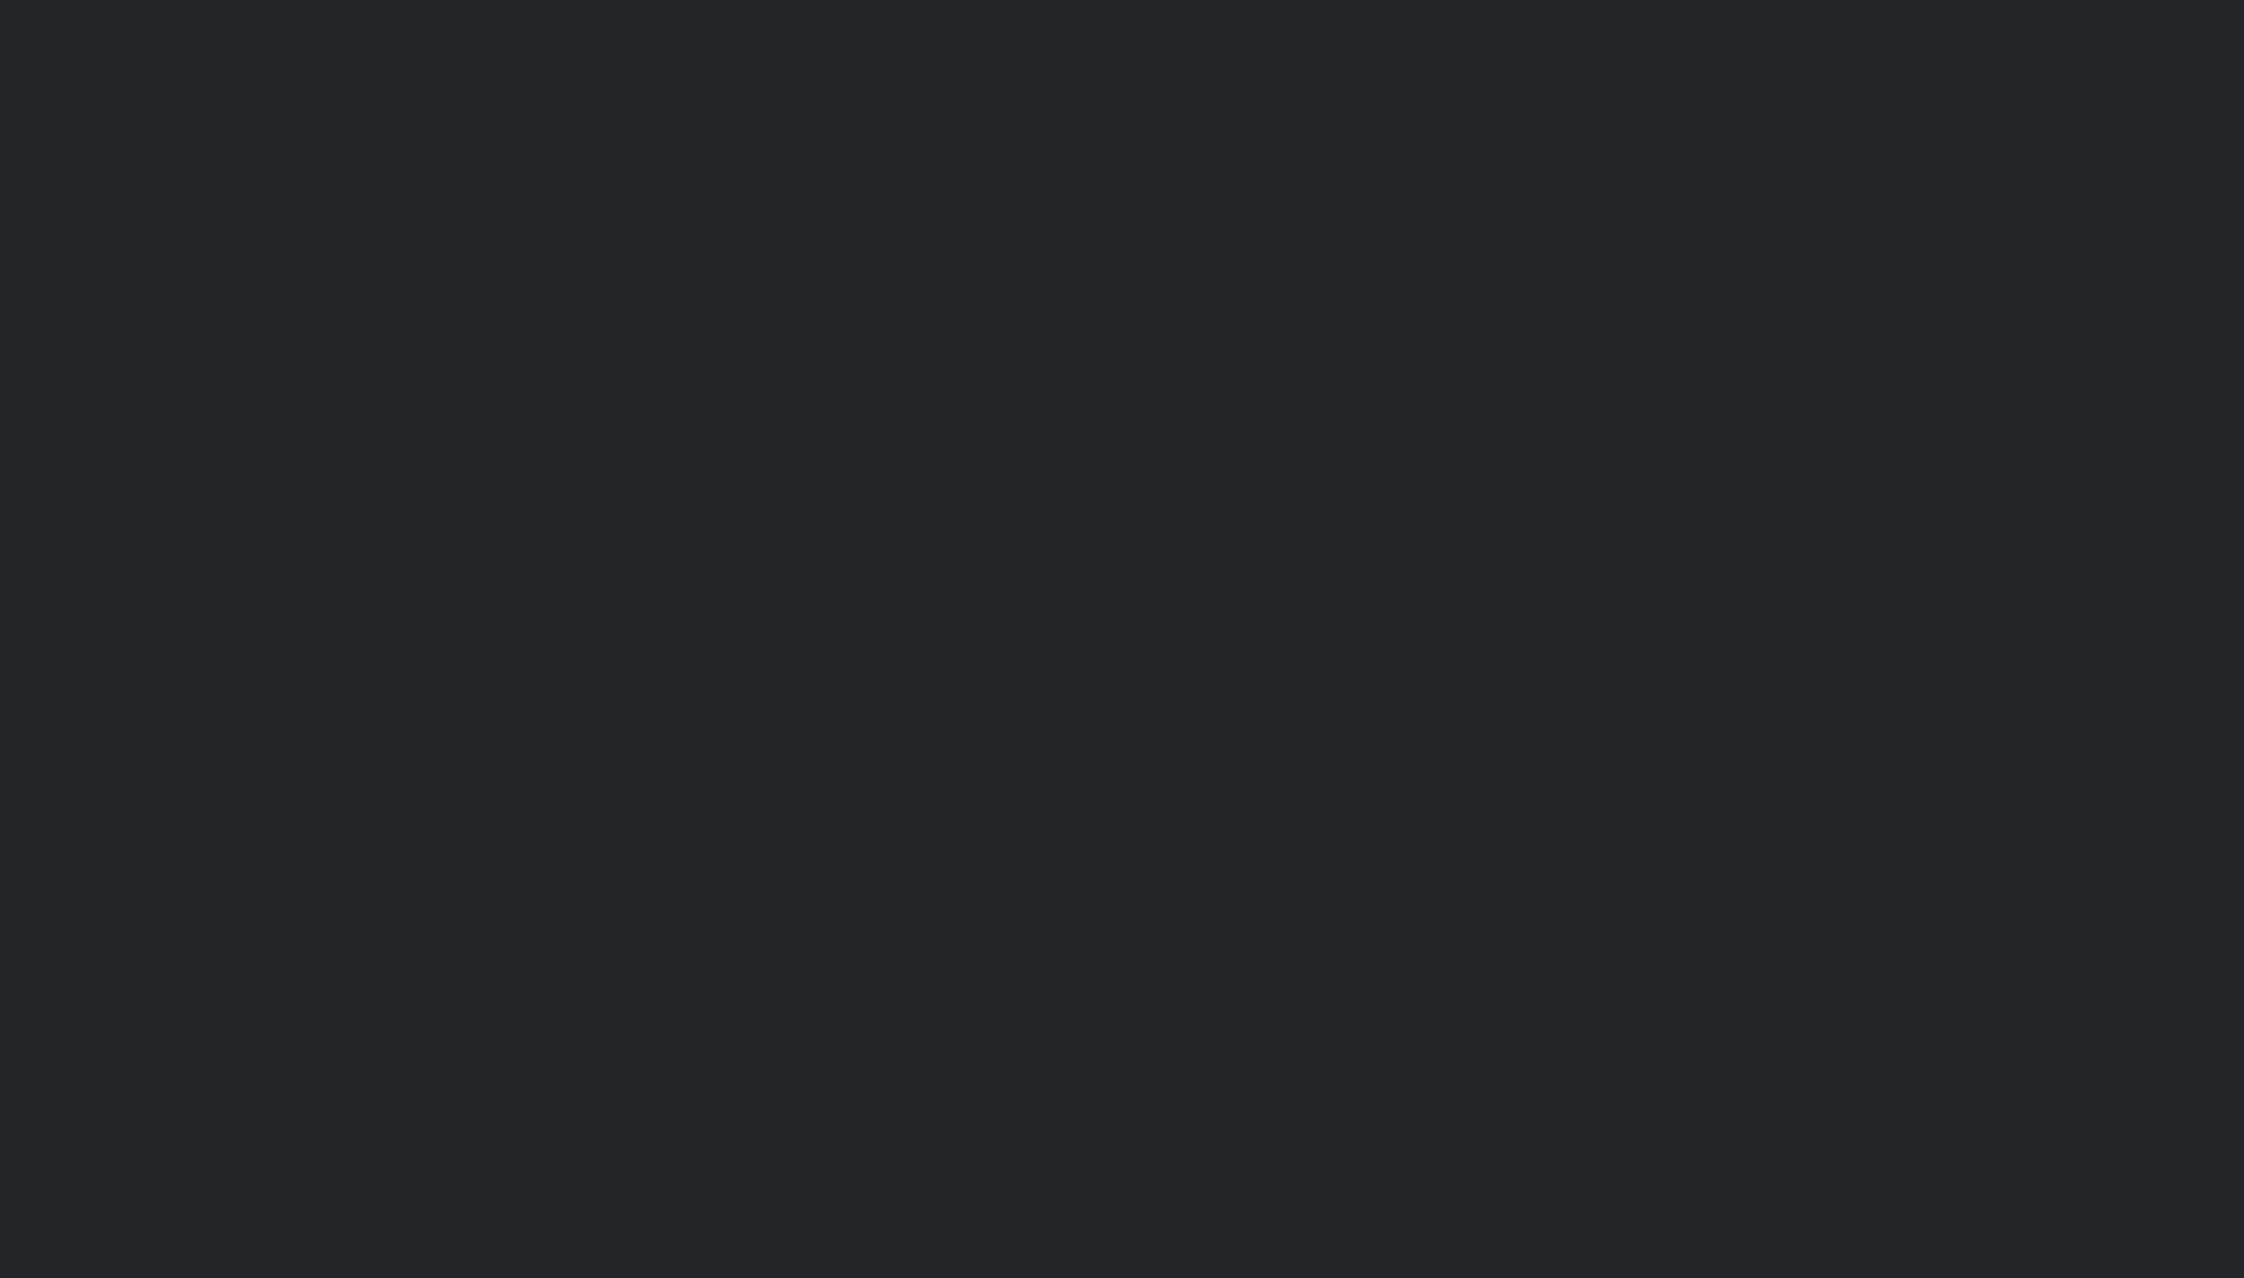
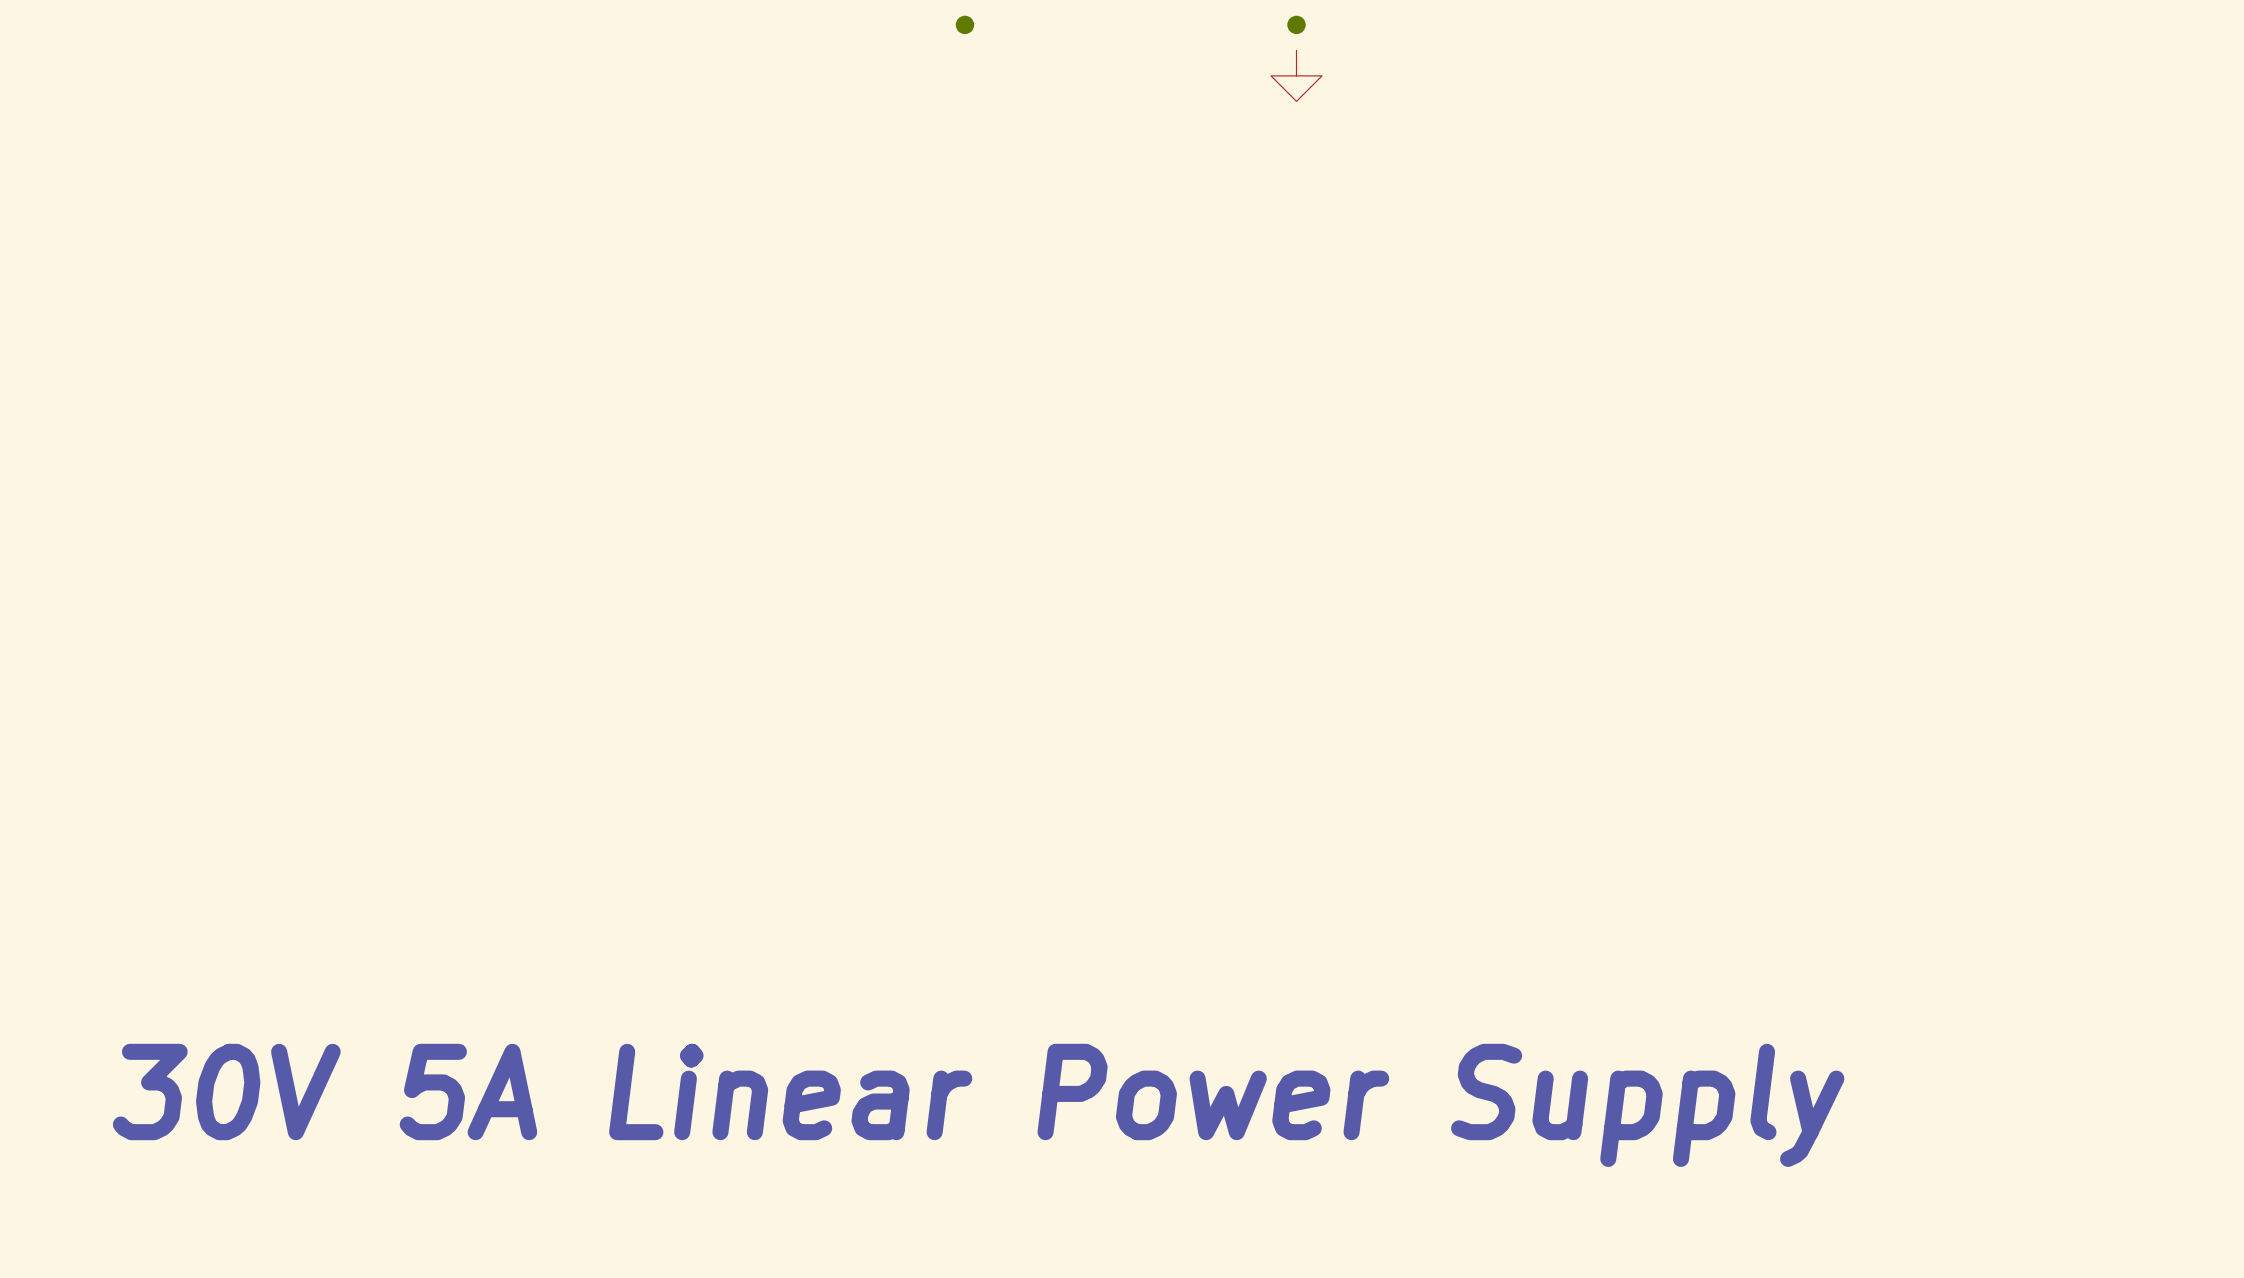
junction: none -> (964, 24)
junction: none -> (1296, 24)
power symbol: none -> (1296, 75)
text: none -> 30V 5A Linear Power Supply (978, 1105)

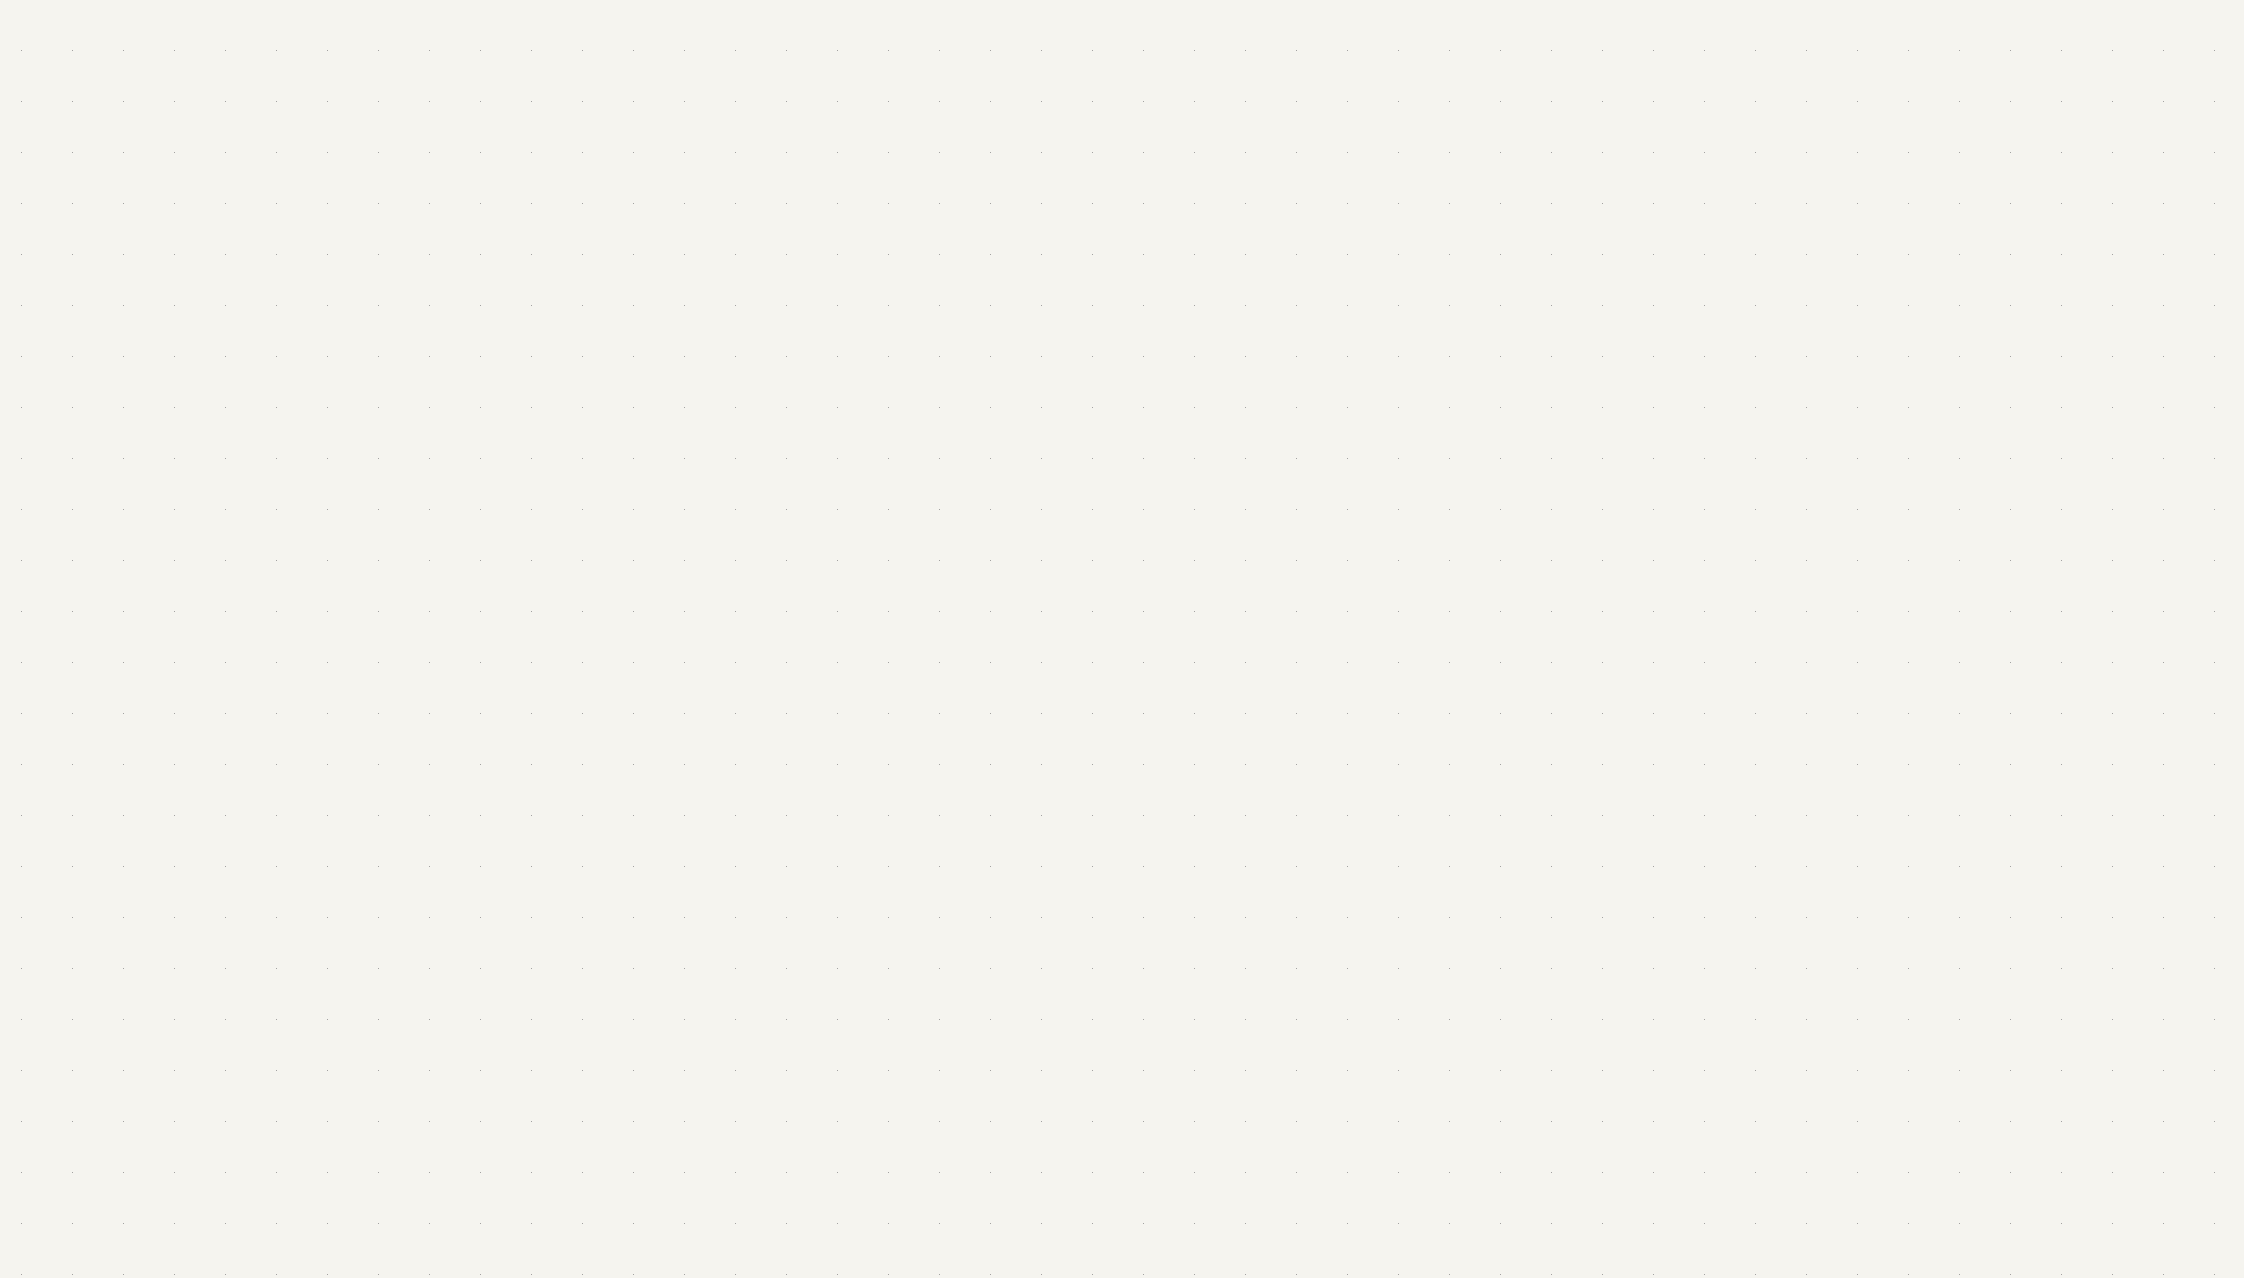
junction: (964, 24) -> none
junction: (1296, 24) -> none
power symbol: (1296, 75) -> none
text: 30V 5A Linear Power Supply (978, 1105) -> none

